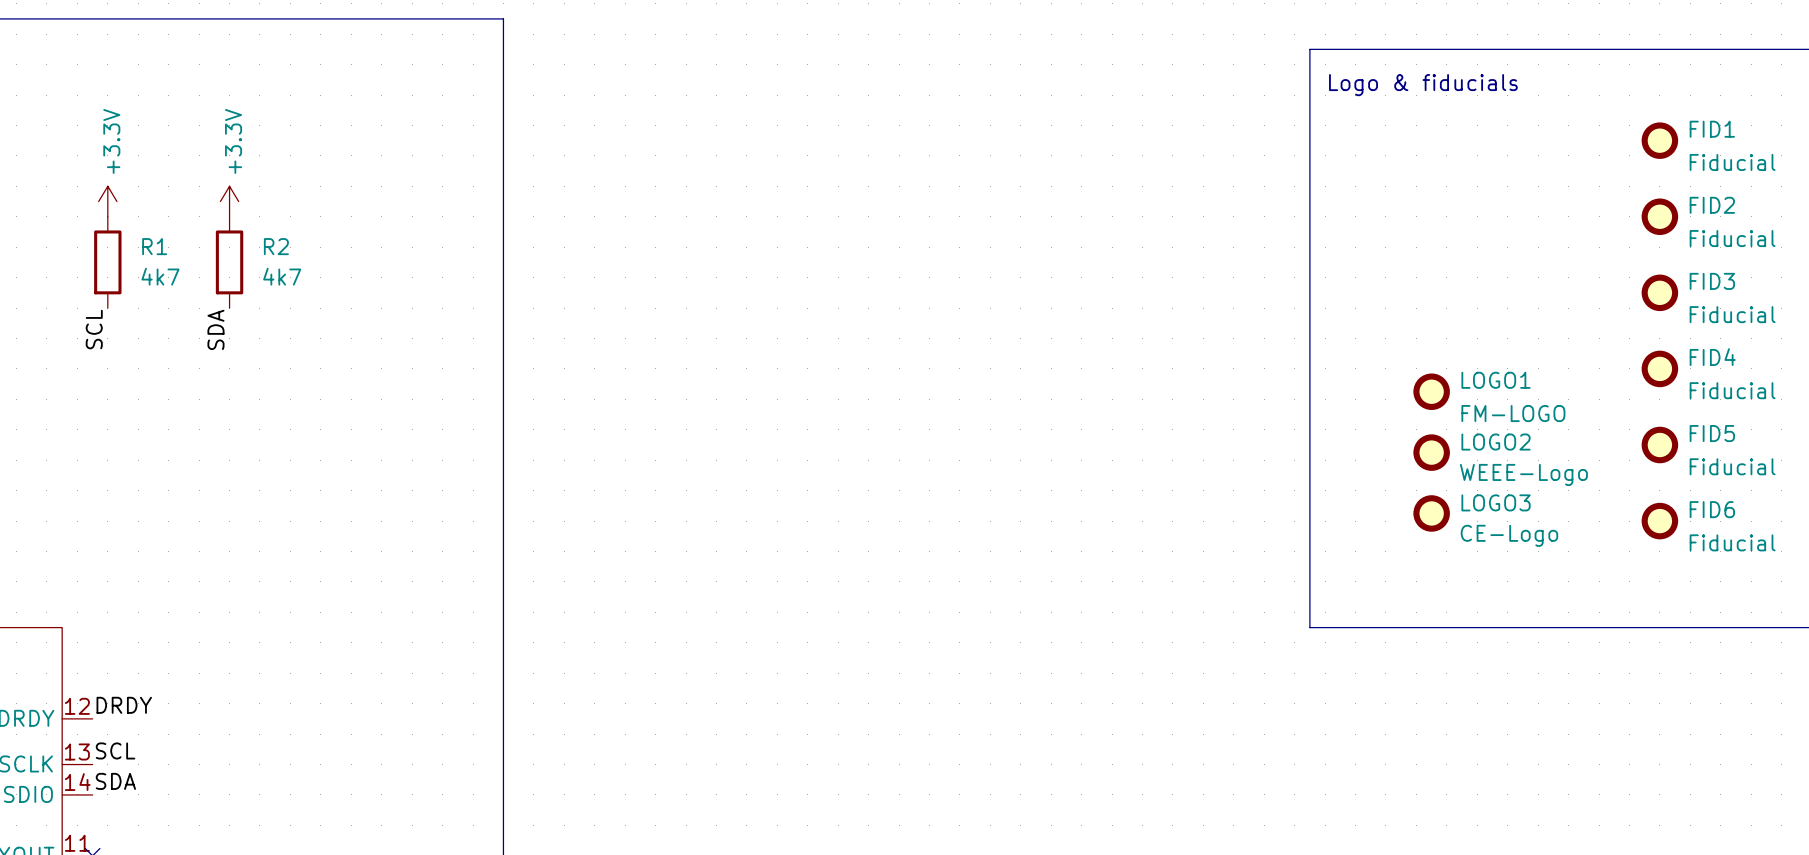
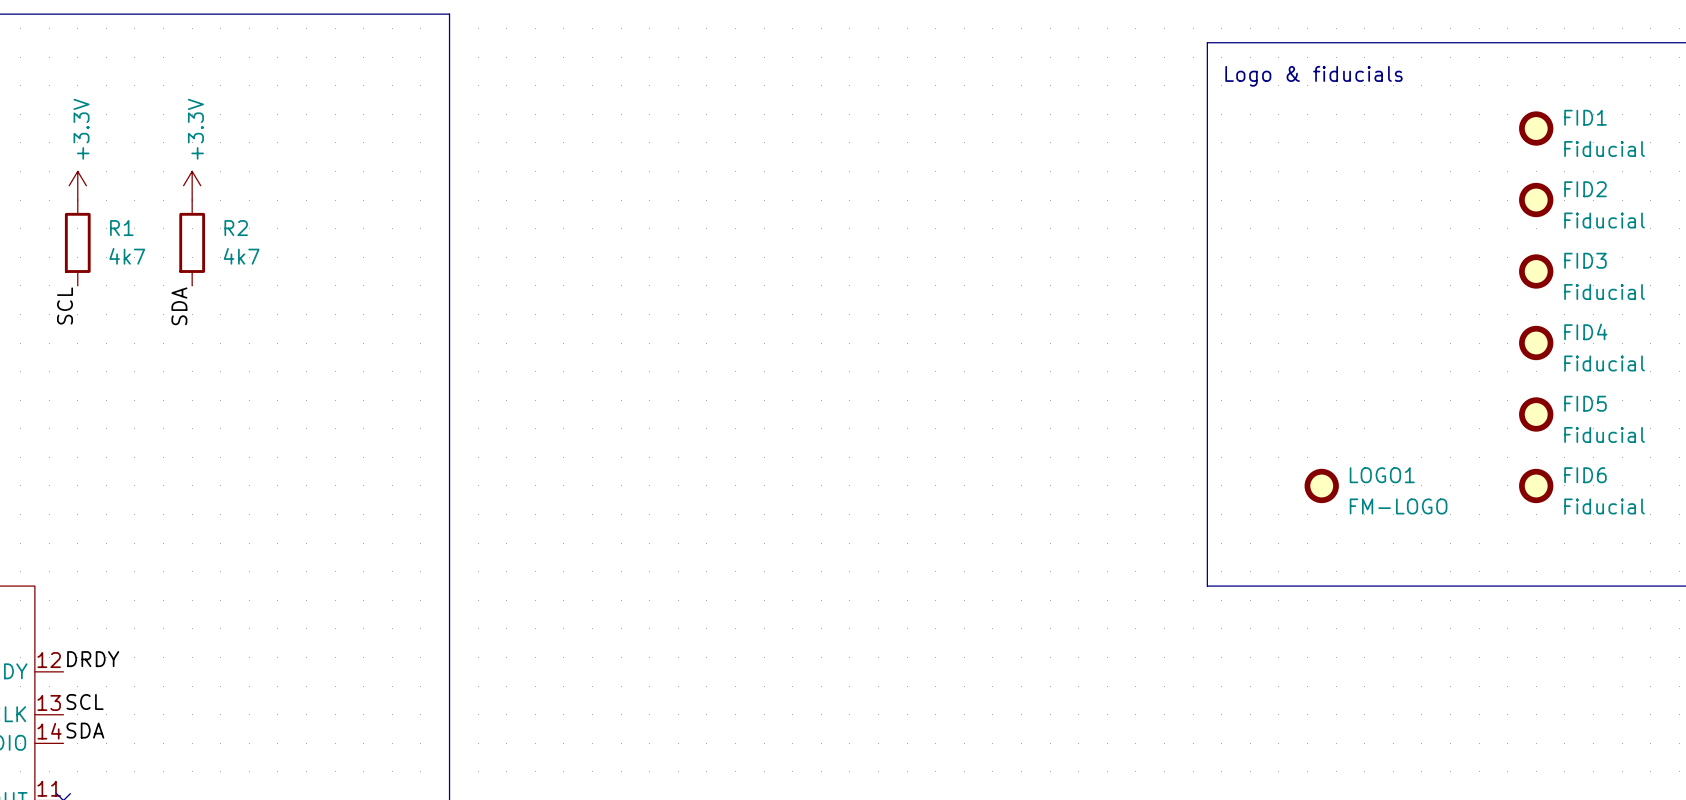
LOGO1 position: (1431, 391) -> (1321, 485)
LOGO2: WEEE-Logo (1431, 452) -> none
LOGO3: CE-Logo (1431, 513) -> none

